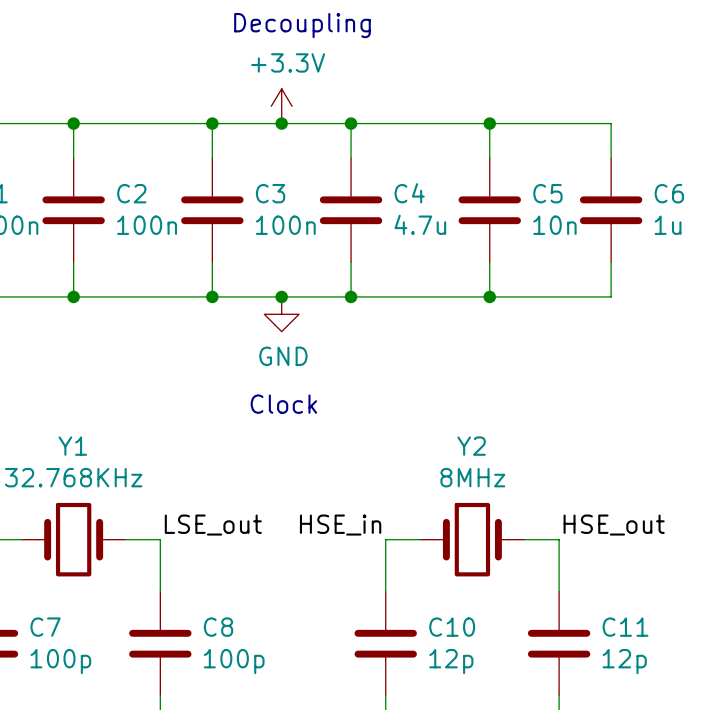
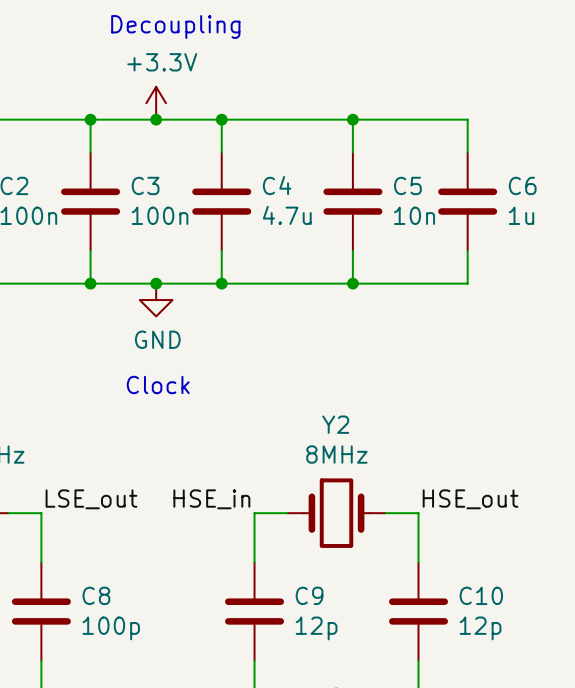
C10 name: C10 (452, 627) -> C9 (309, 595)
C11 name: C11 (625, 627) -> C10 (481, 595)

